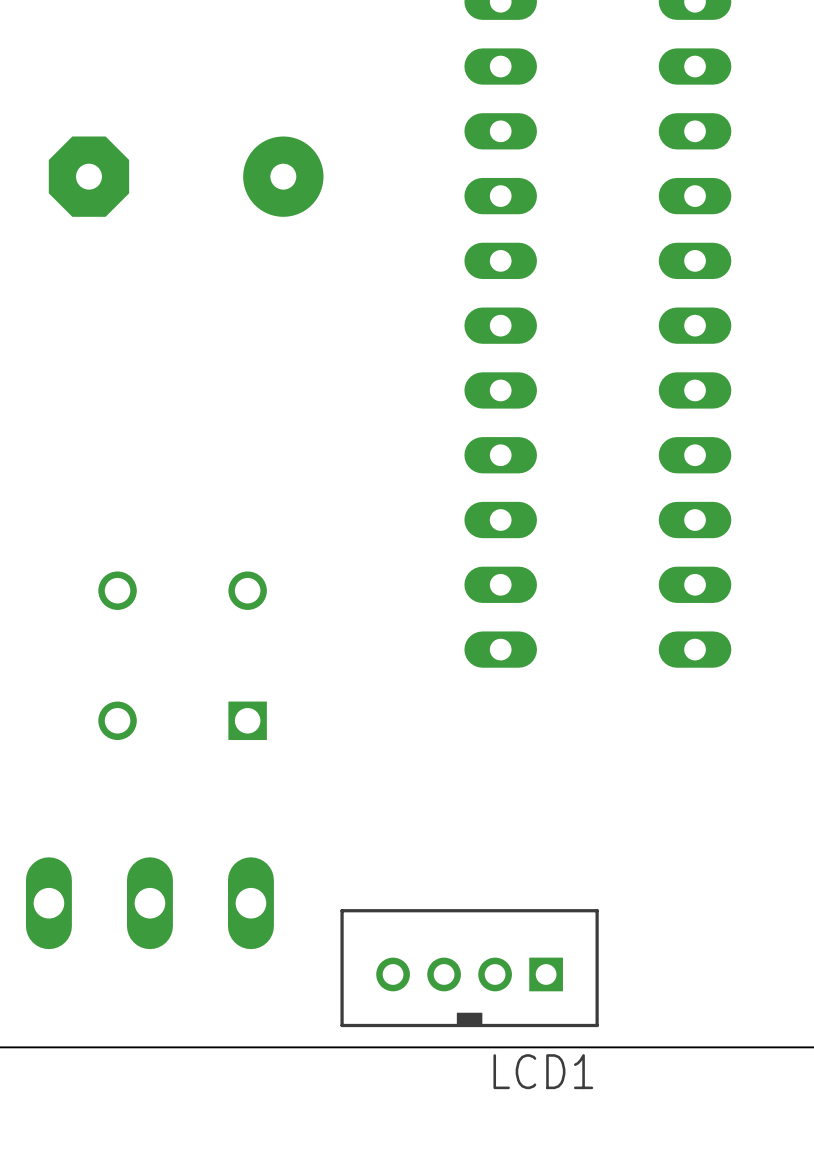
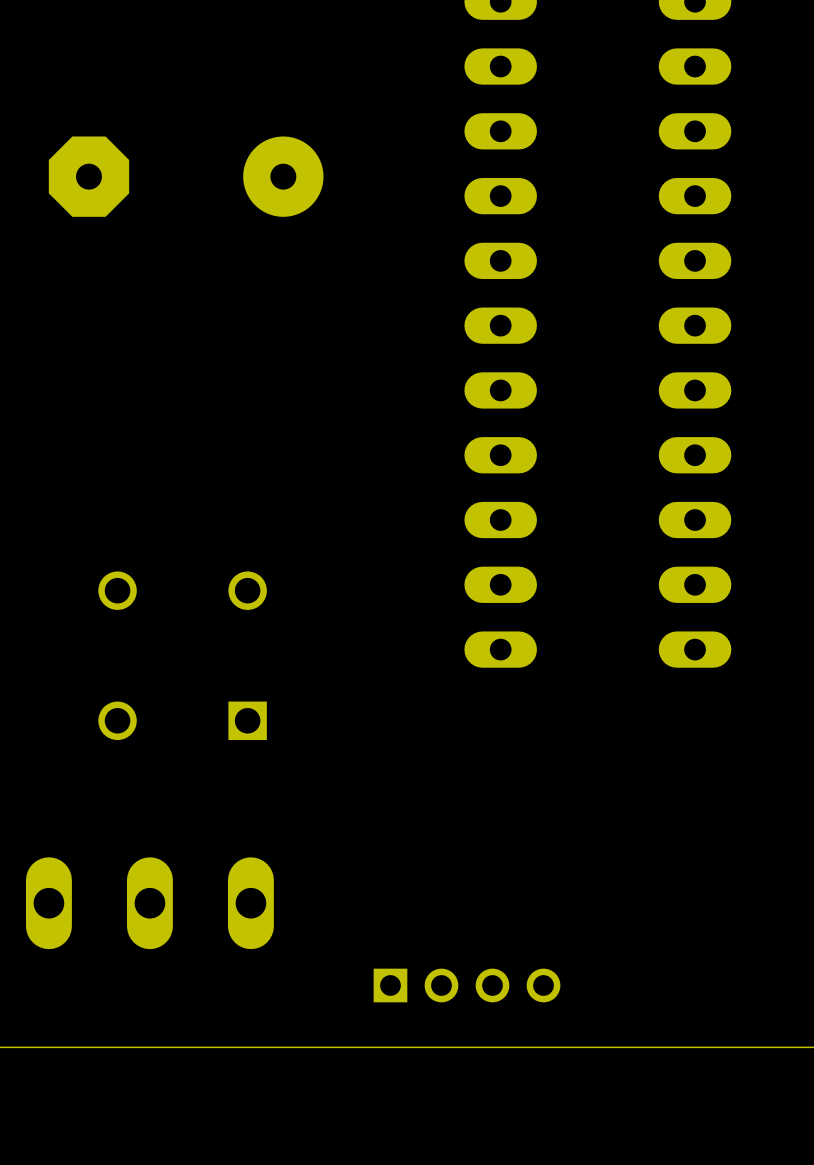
LCD1 side: bottom (469, 968) -> top (467, 985)

